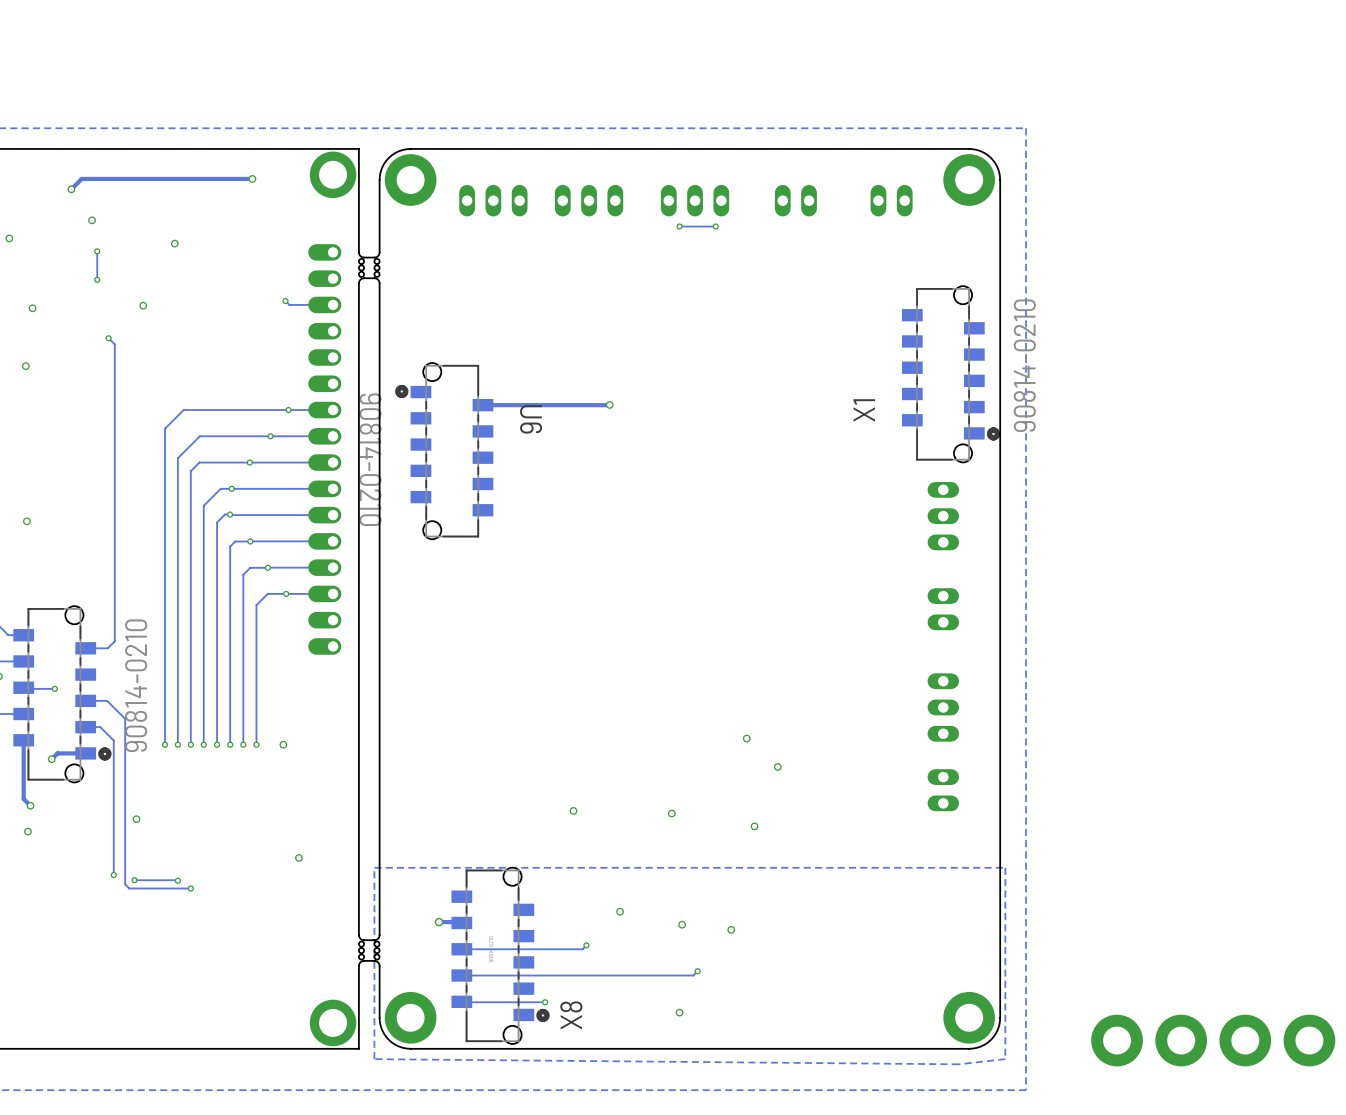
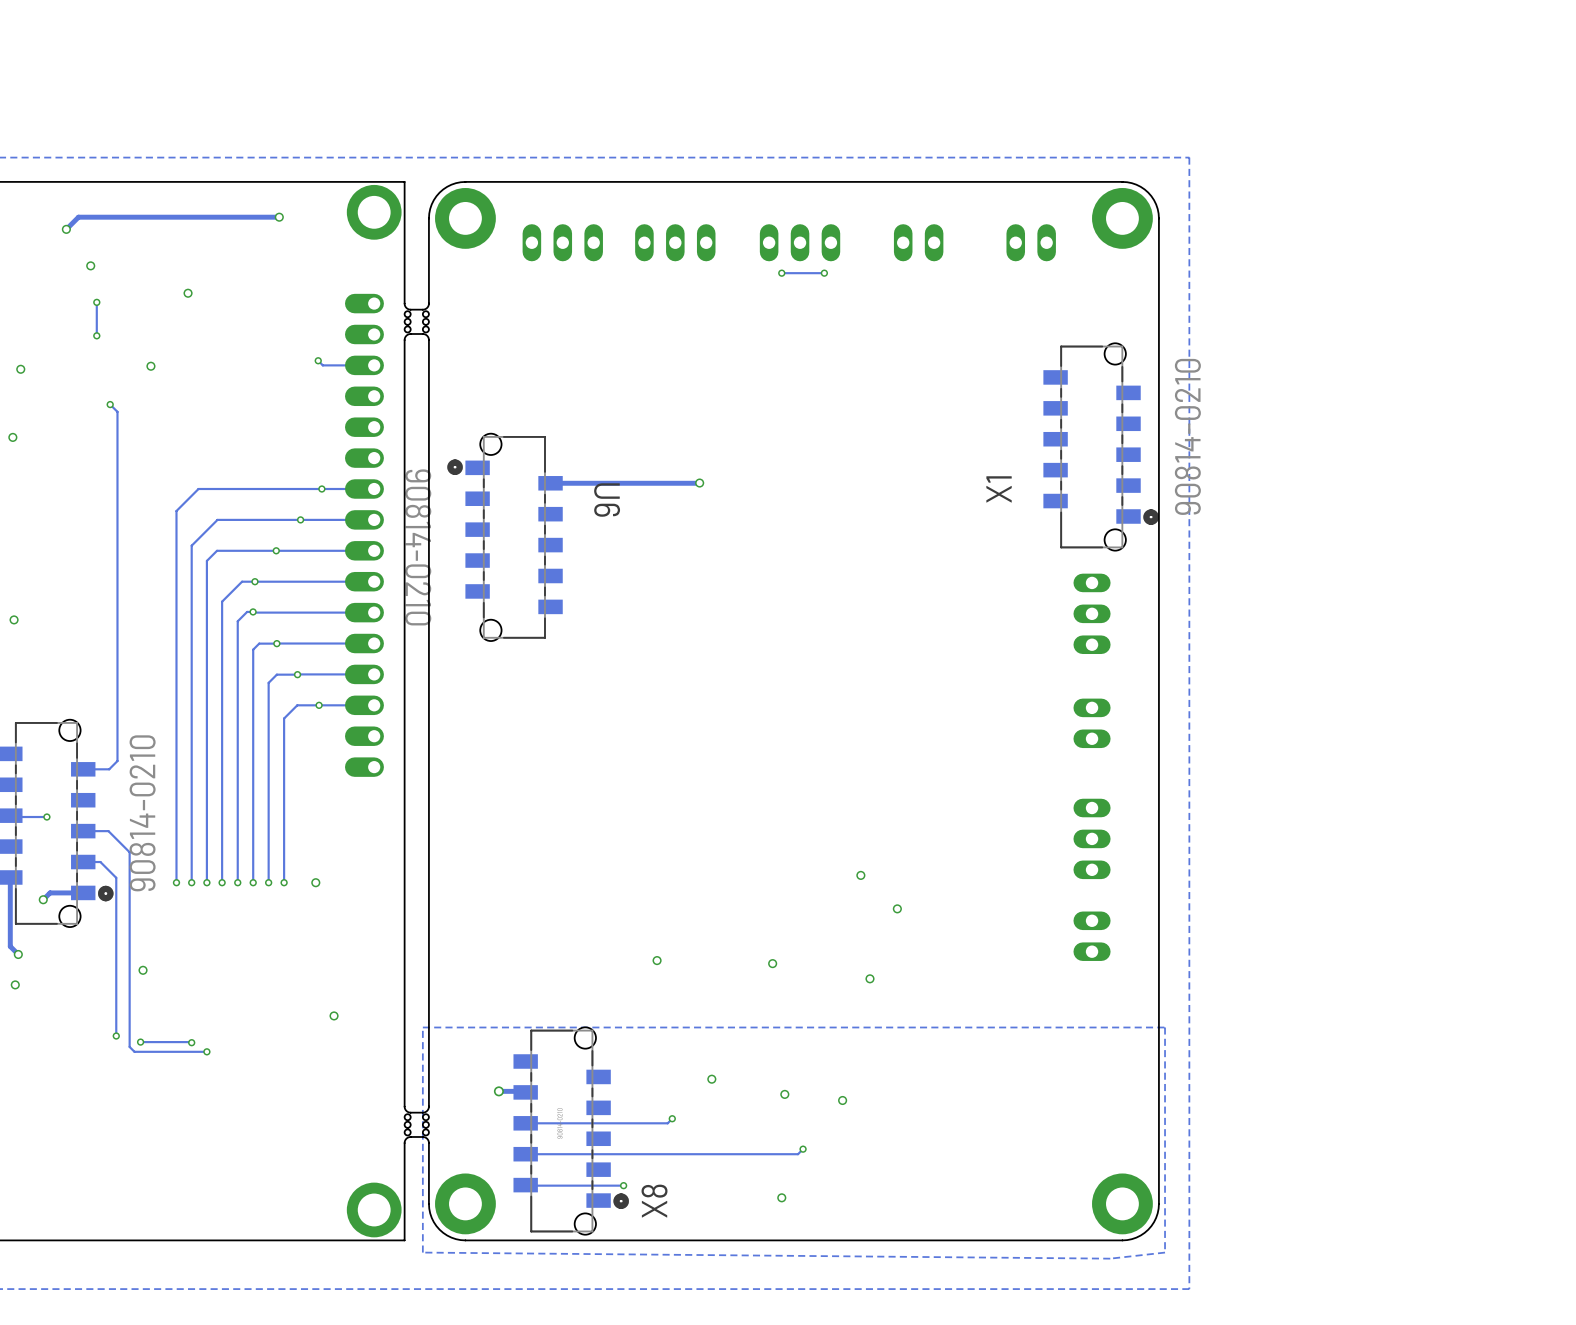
part: (1117, 1040) -> none
part: (1181, 1040) -> none
part: (1245, 1040) -> none
part: (1309, 1040) -> none

